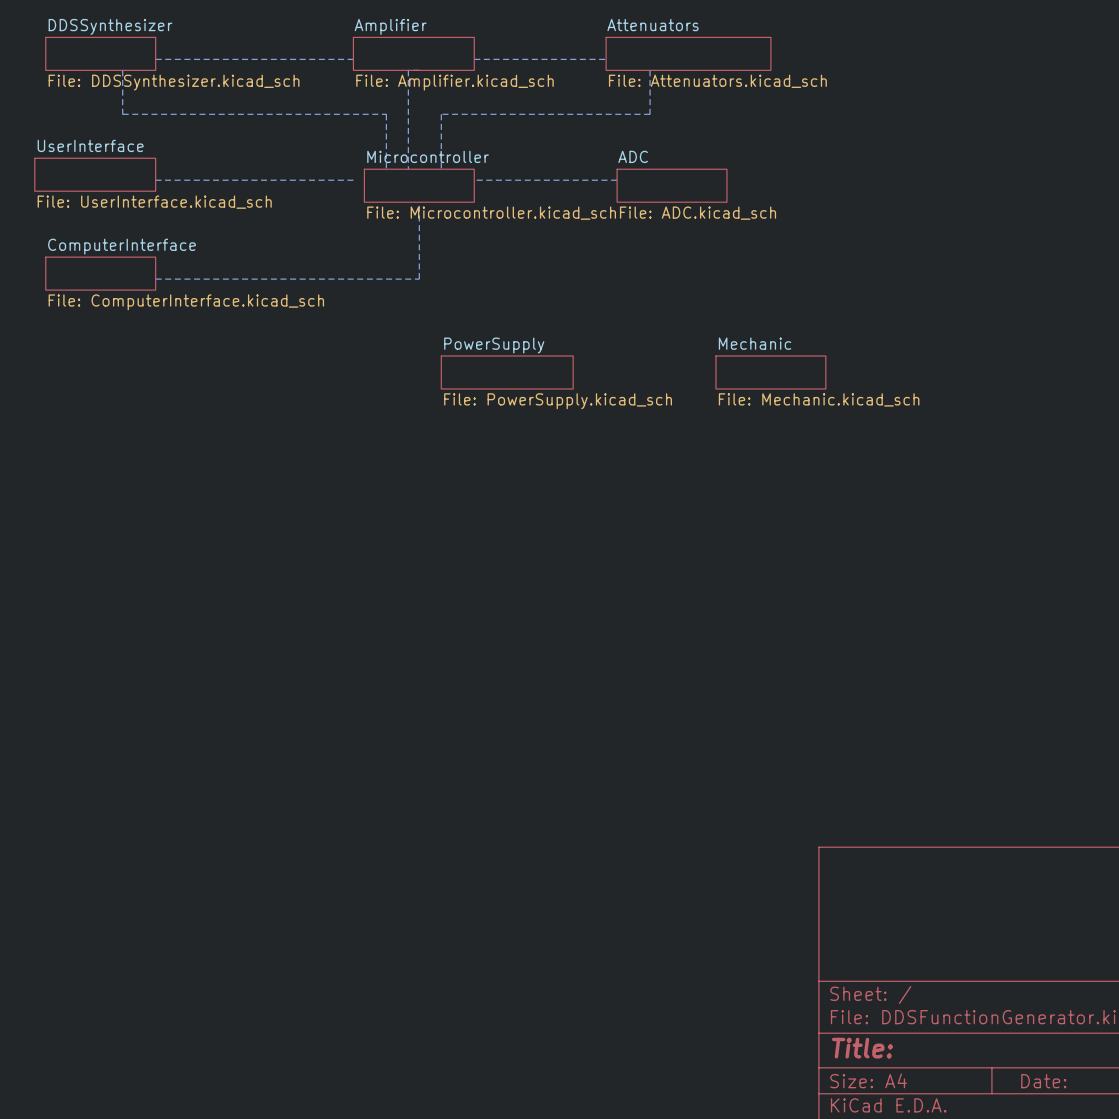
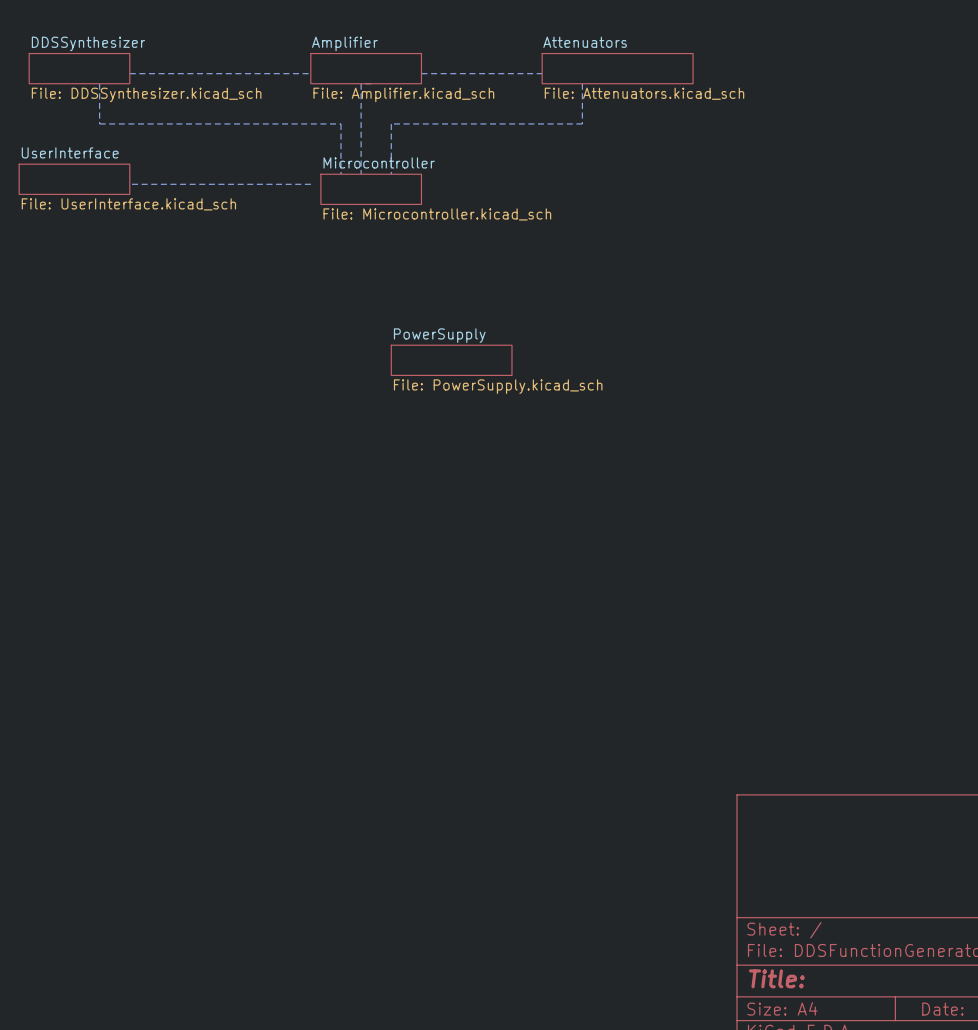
line: (474, 180) (617, 180) -> none
sheet ADC: File: ADC.kicad_sch (672, 185) -> none
line: (419, 202) (419, 279) (155, 279) -> none
sheet ComputerInterface: File: ComputerInterface.kicad_sch (100, 273) -> none
sheet Mechanic: File: Mechanic.kicad_sch (770, 372) -> none

